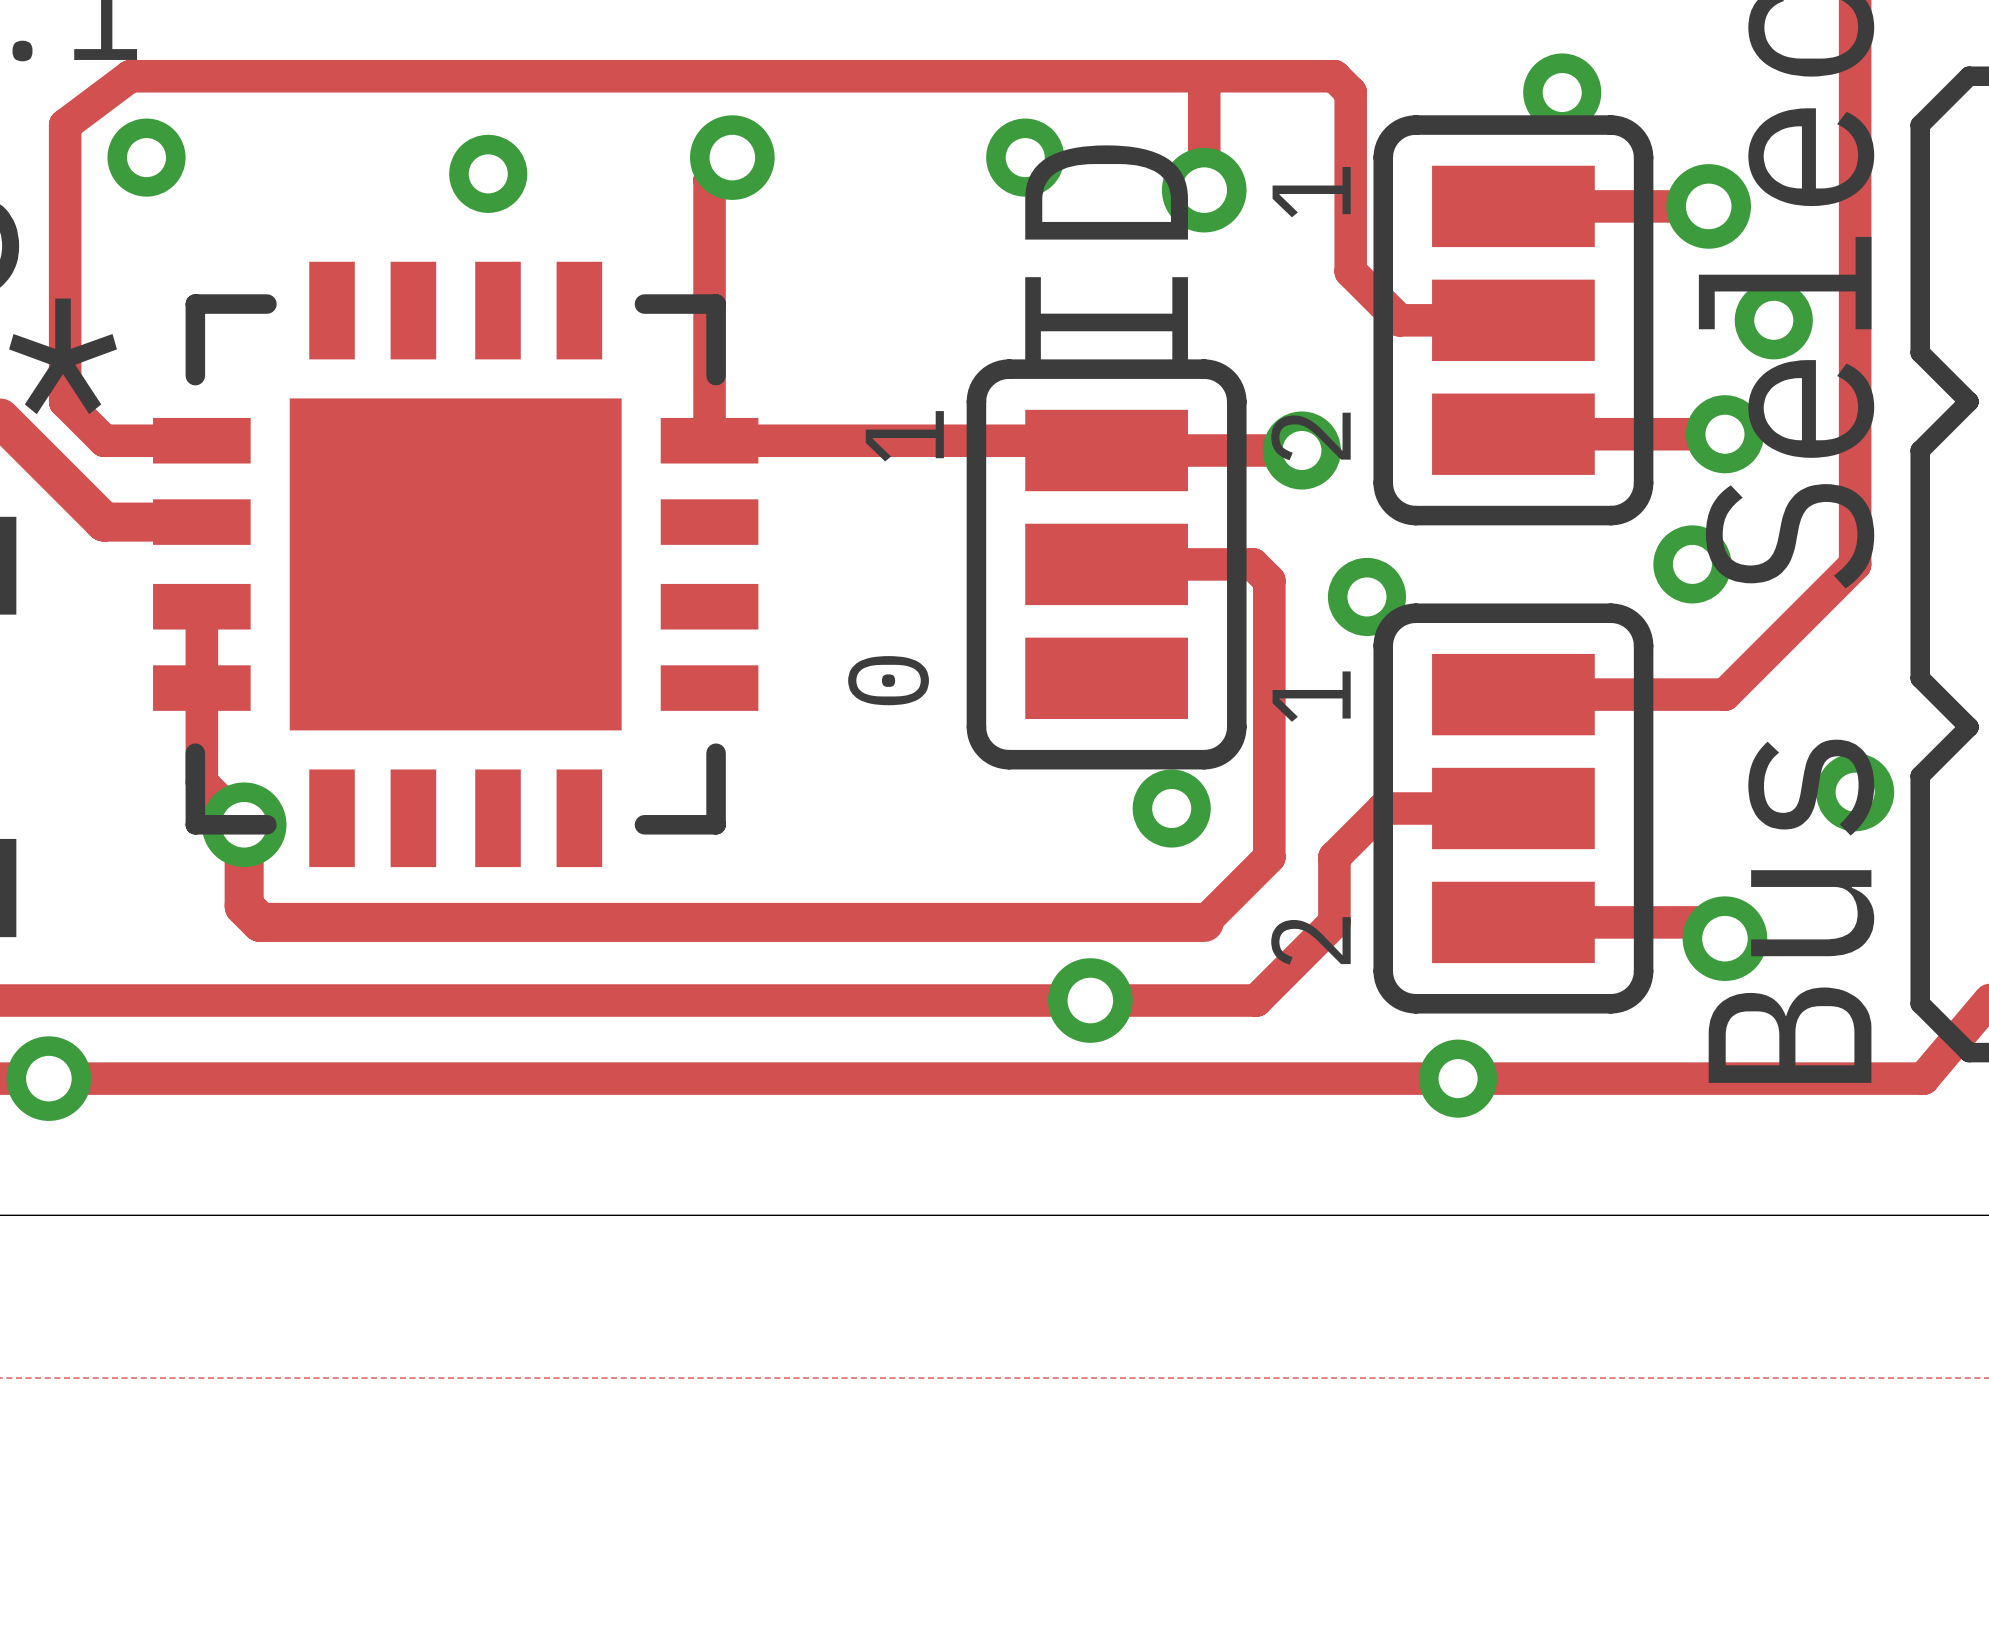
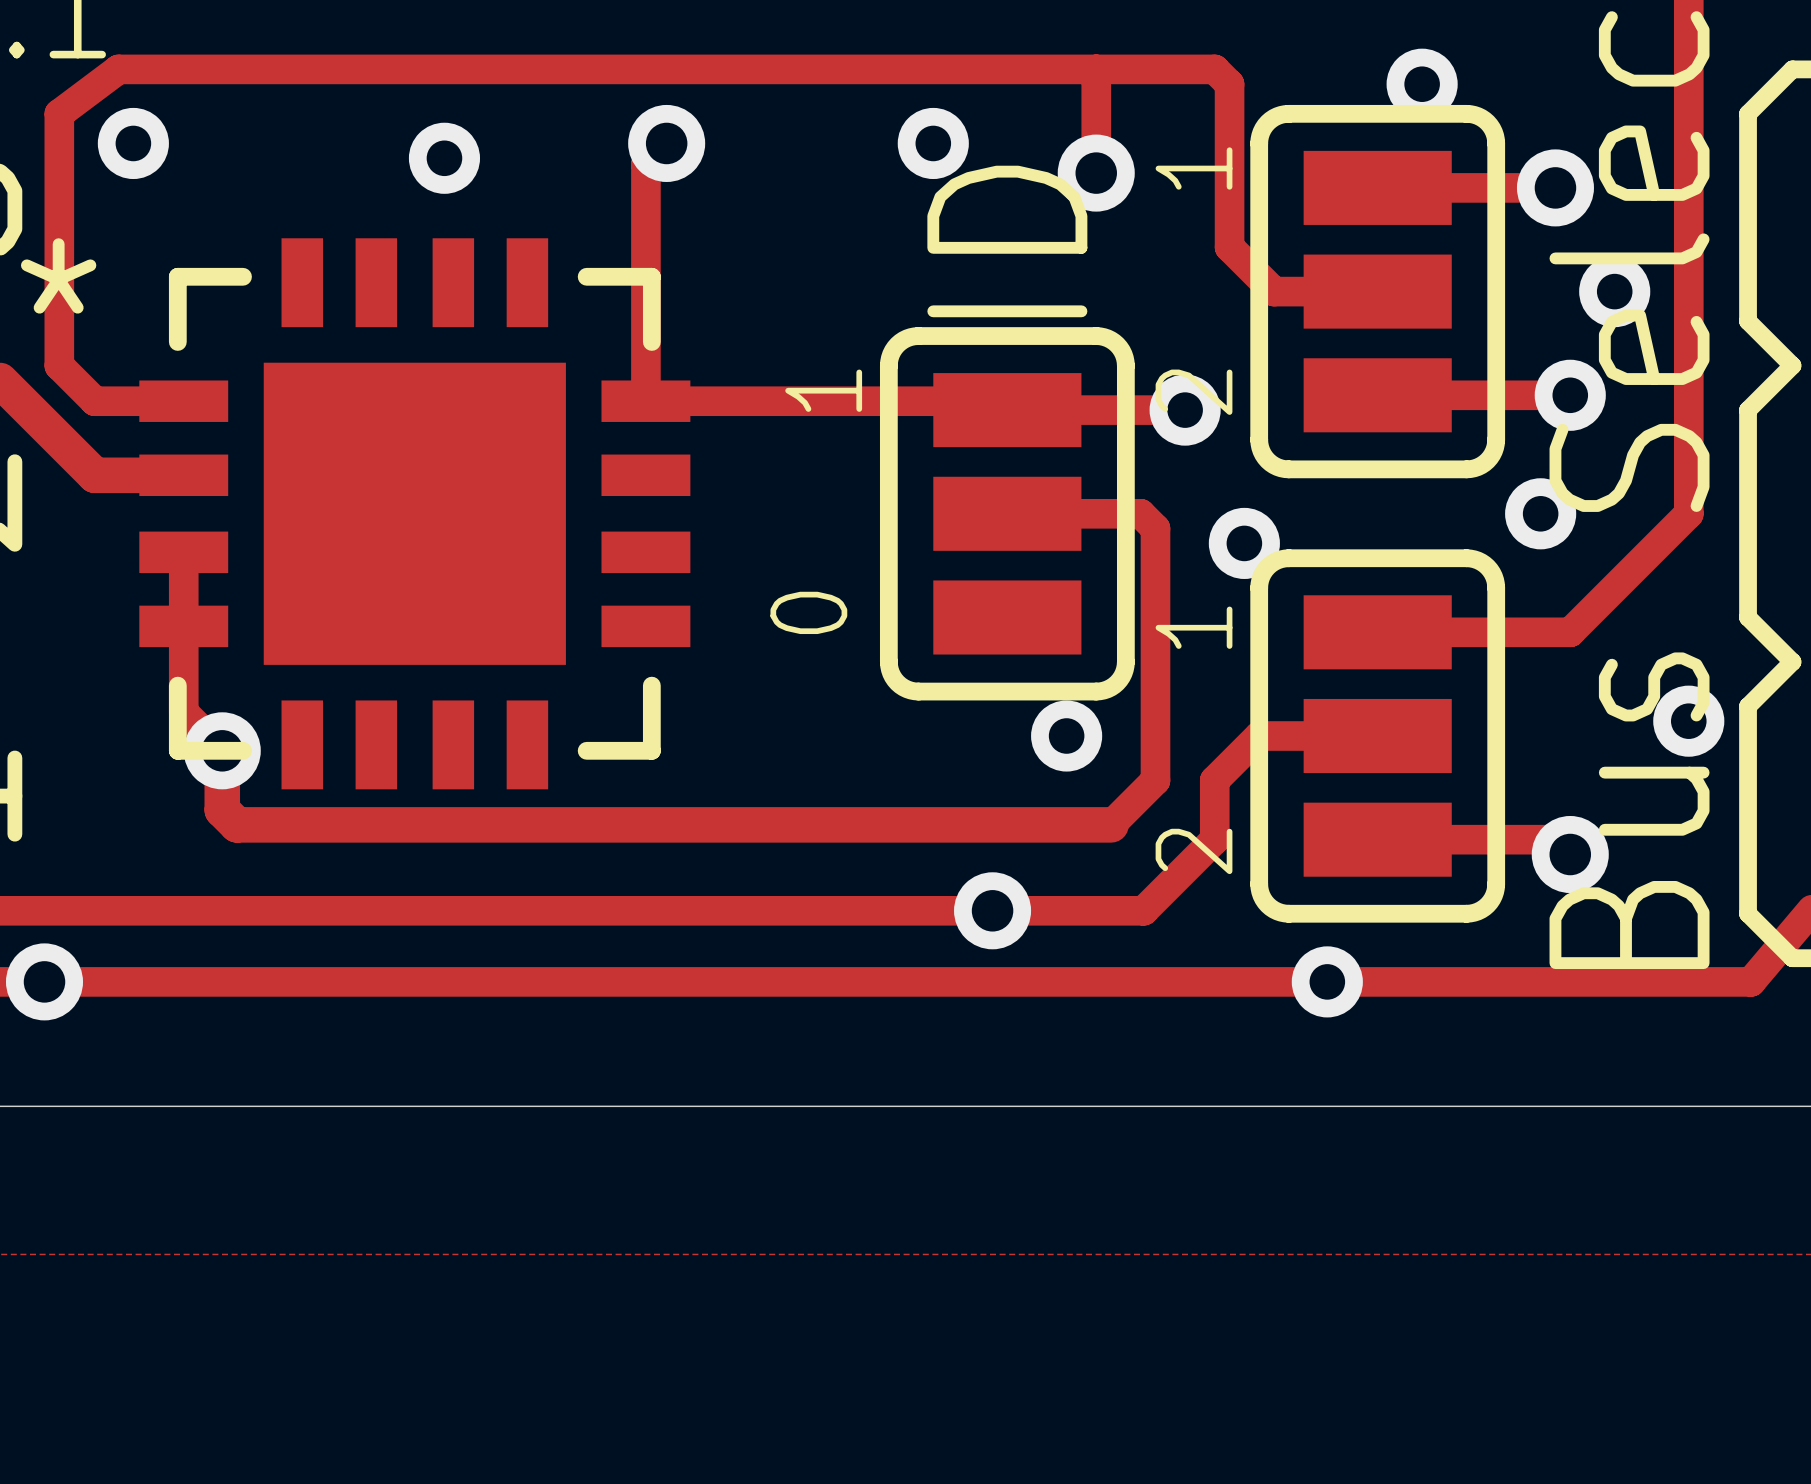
track: (244, 889) (244, 906) (260, 922) (1204, 922) (1220, 906) -> (222, 810) (237, 824) (1111, 824)

